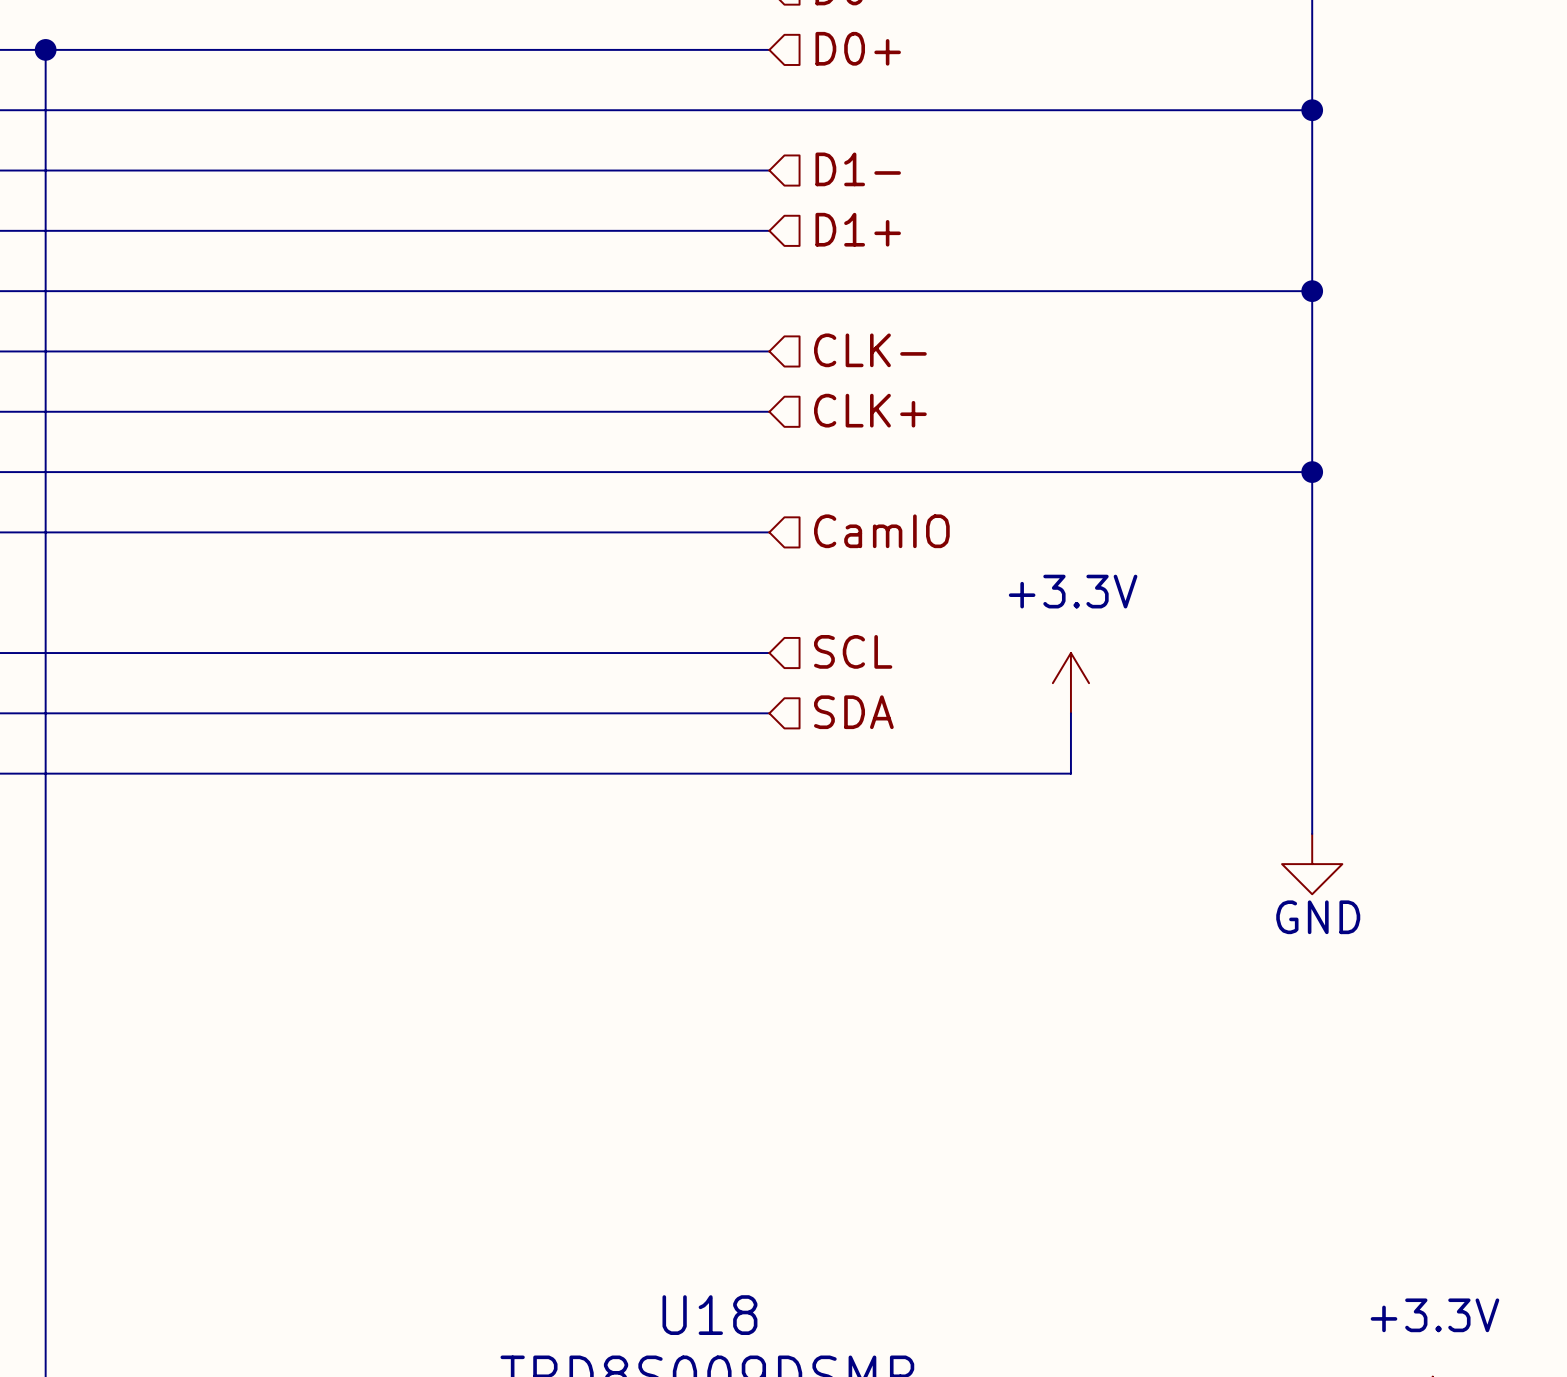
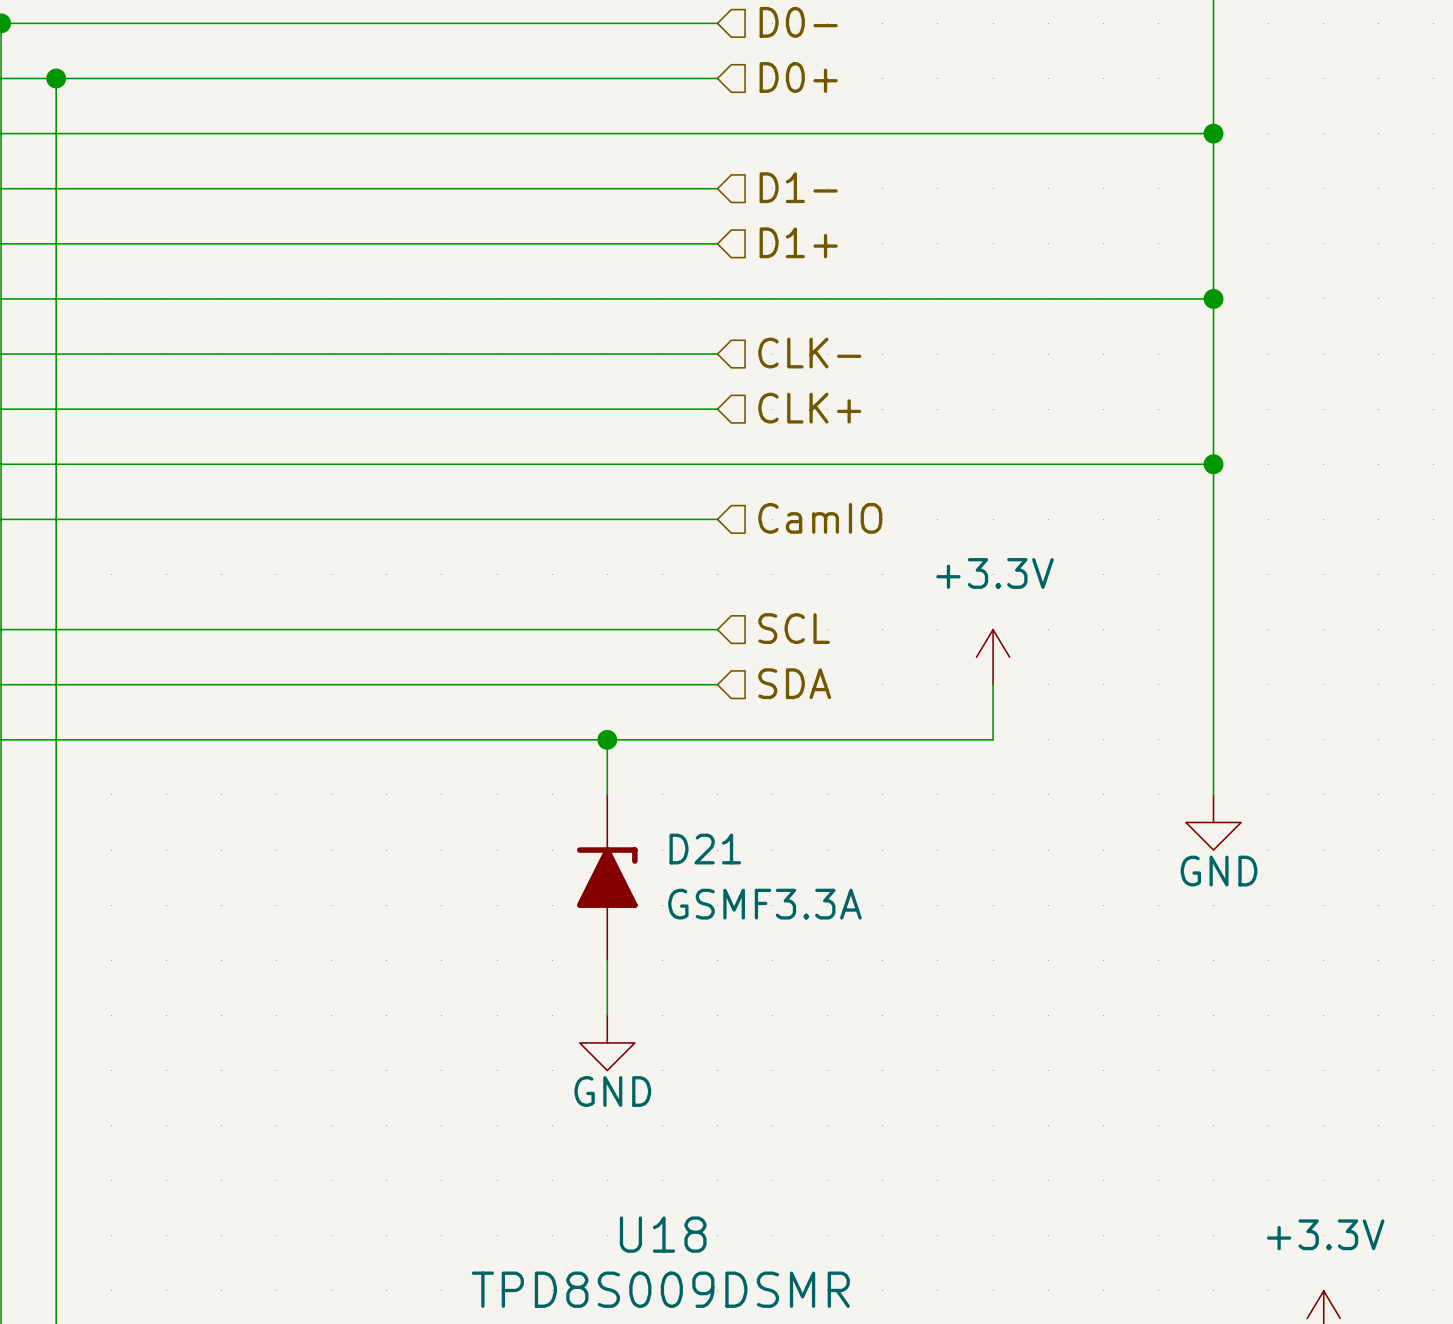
wire: none -> (607, 739) (607, 794)
junction: none -> (607, 739)
D21: none -> GSMF3.3A (607, 877)
wire: none -> (607, 960) (607, 1015)
power symbol: none -> GND (607, 1042)

